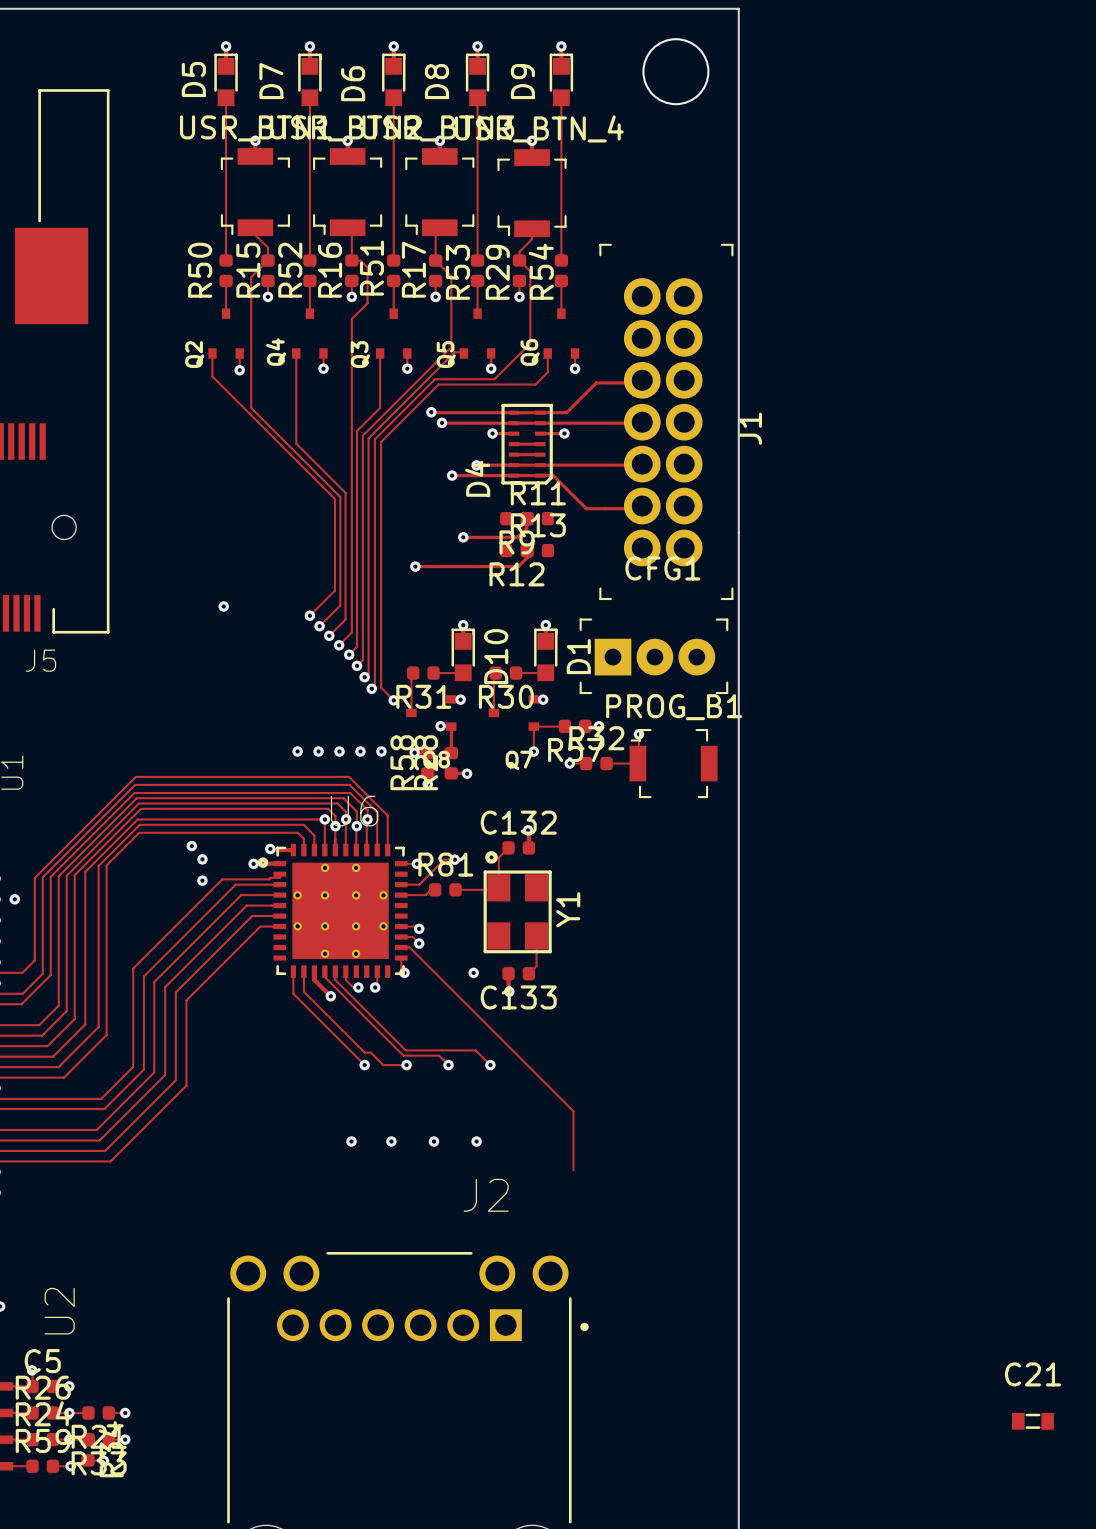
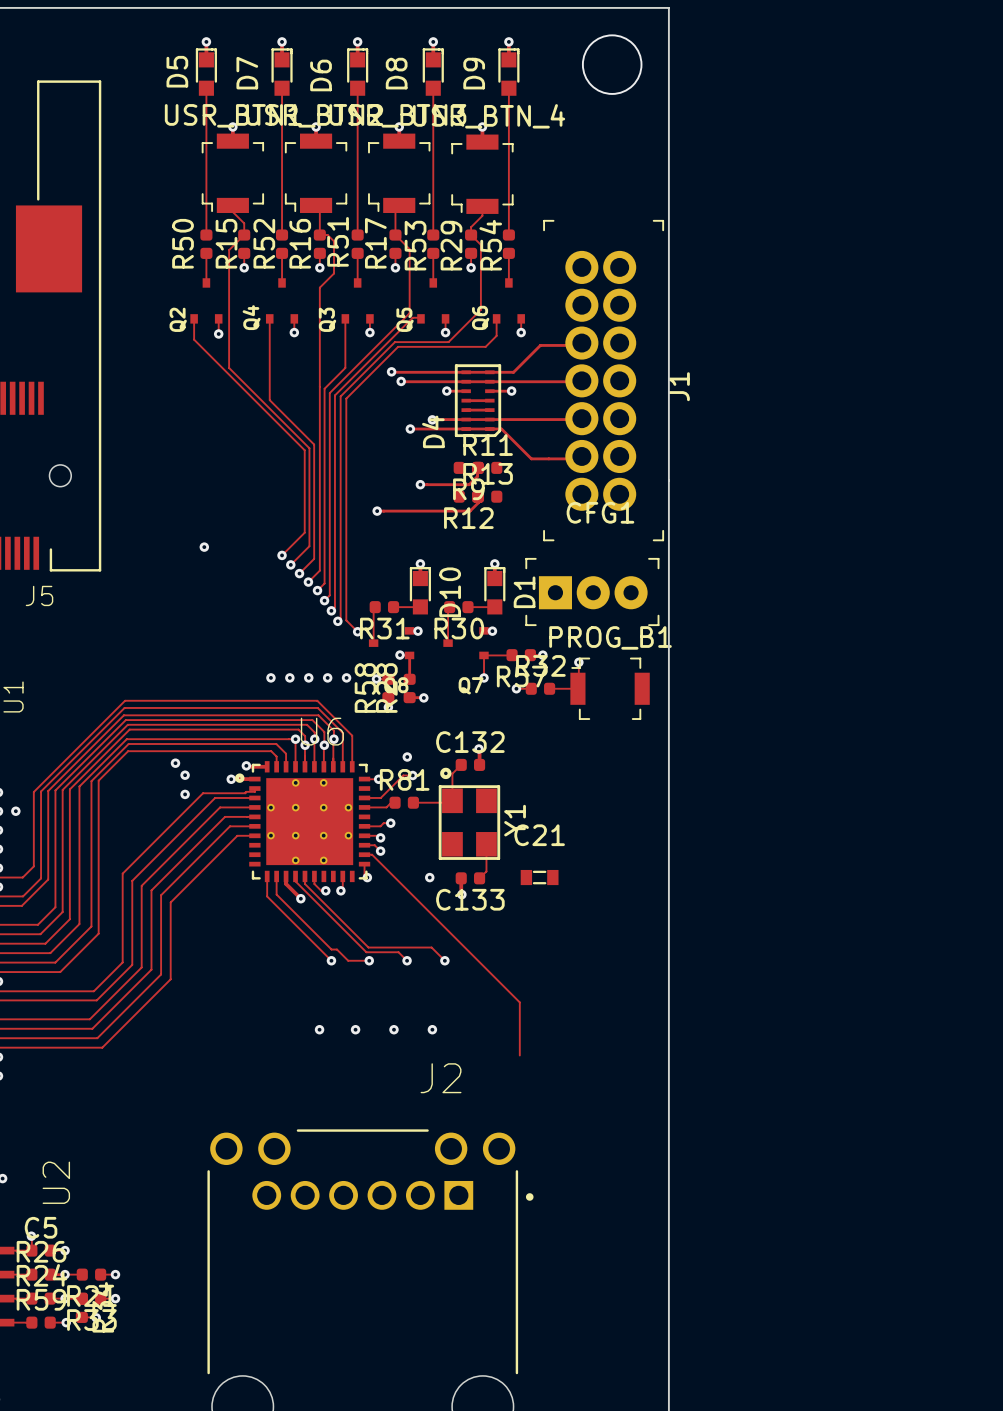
via: none -> (407, 757)
track: none -> (390, 823) (383, 823) (380, 826) (364, 826)
via: none -> (390, 823)
C21 position: (1032, 1421) -> (539, 877)

